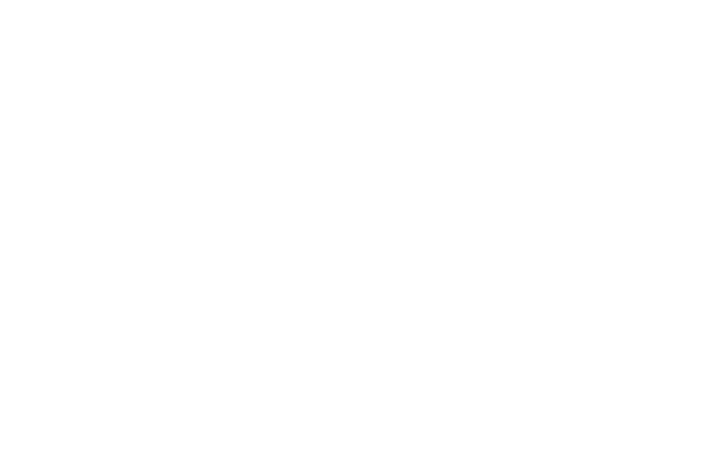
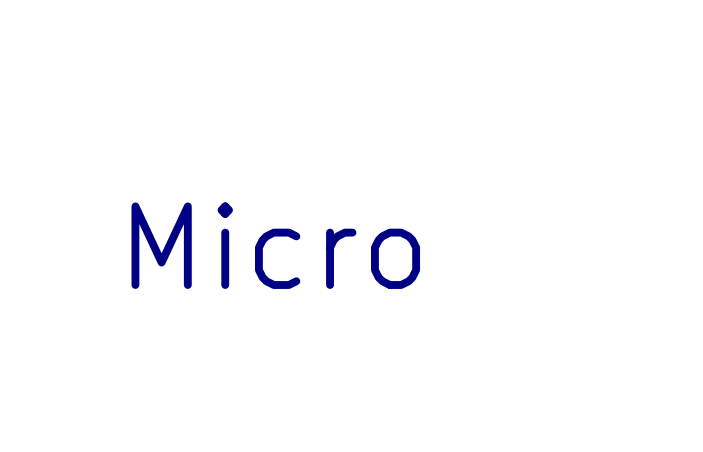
text: none -> Micro (275, 245)

